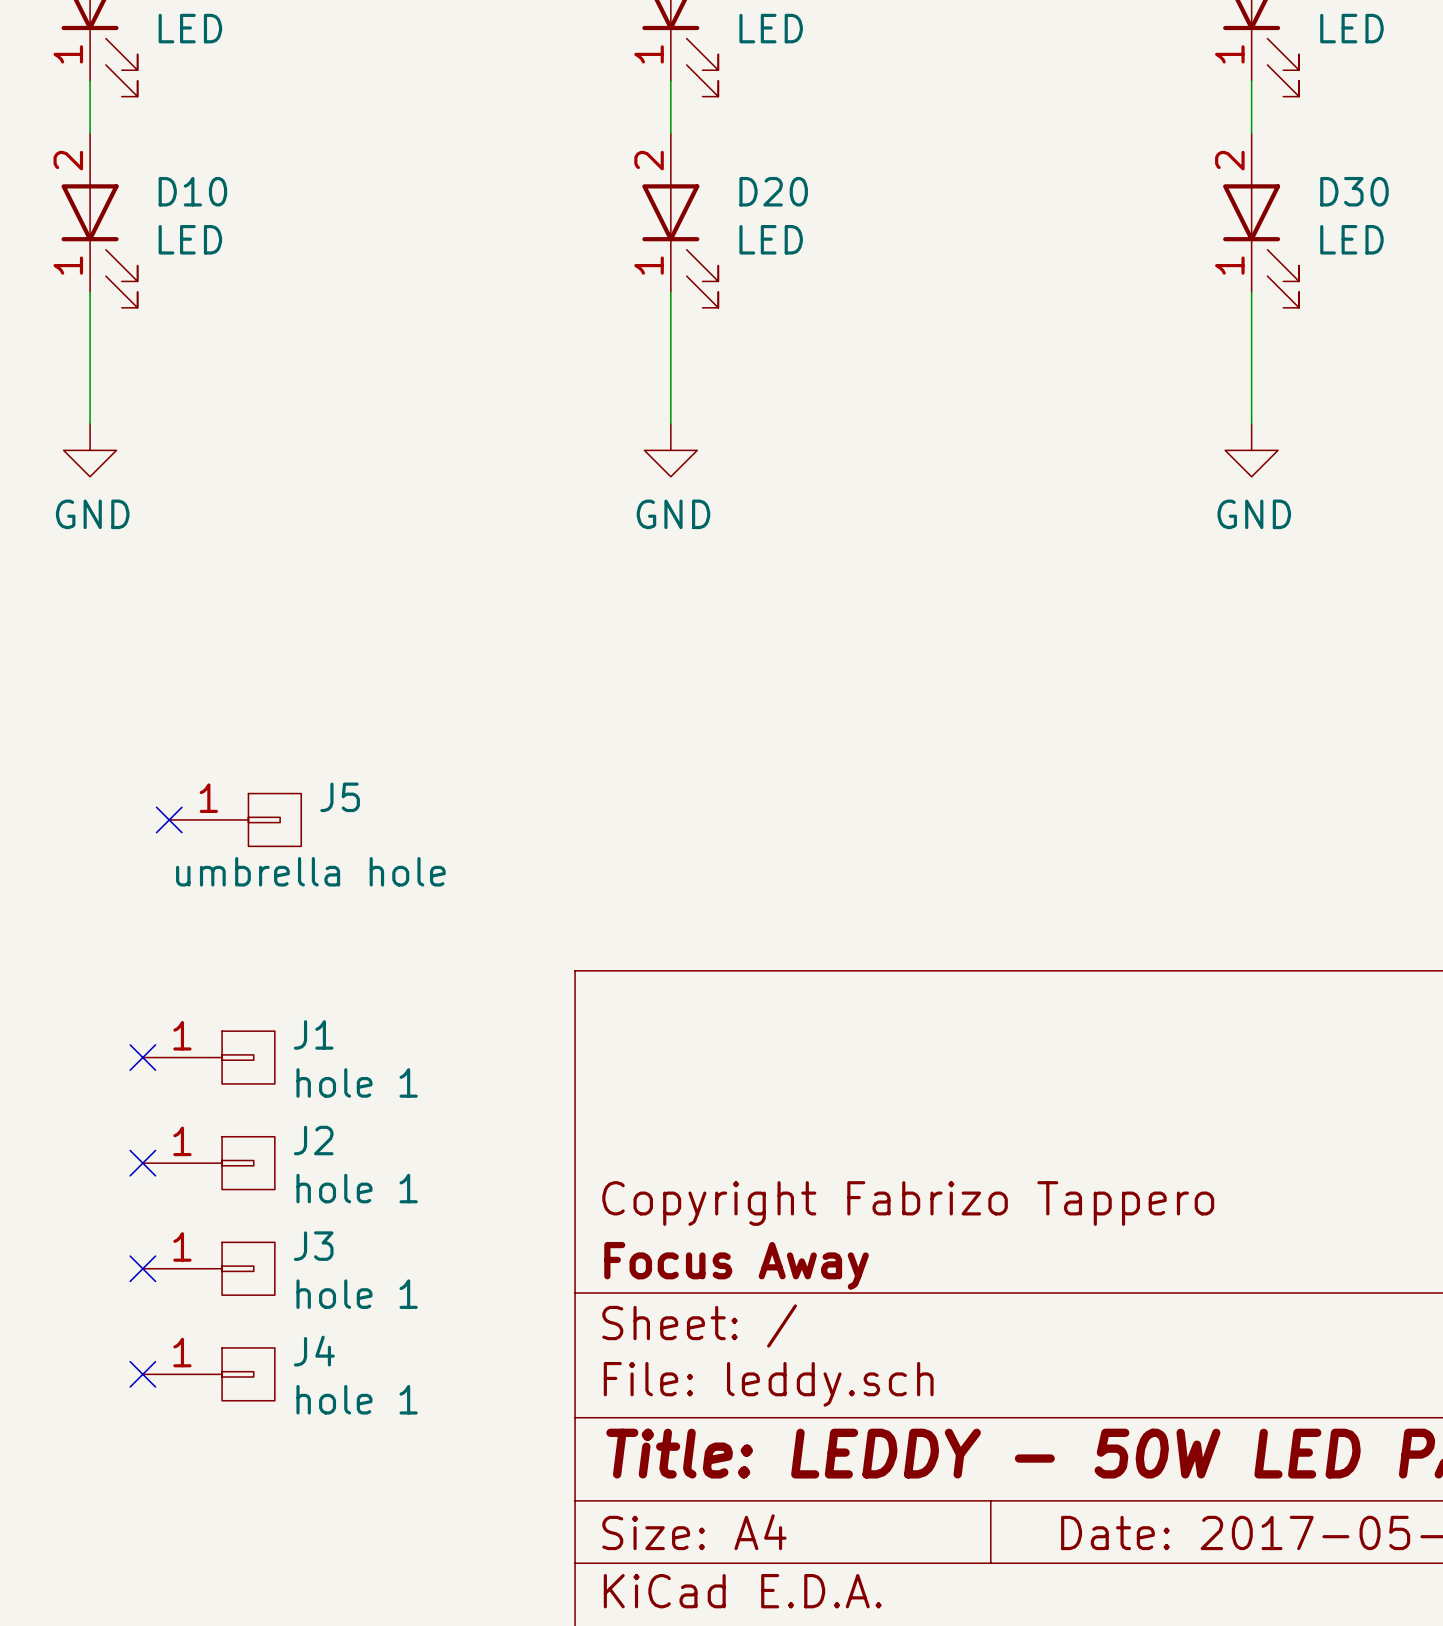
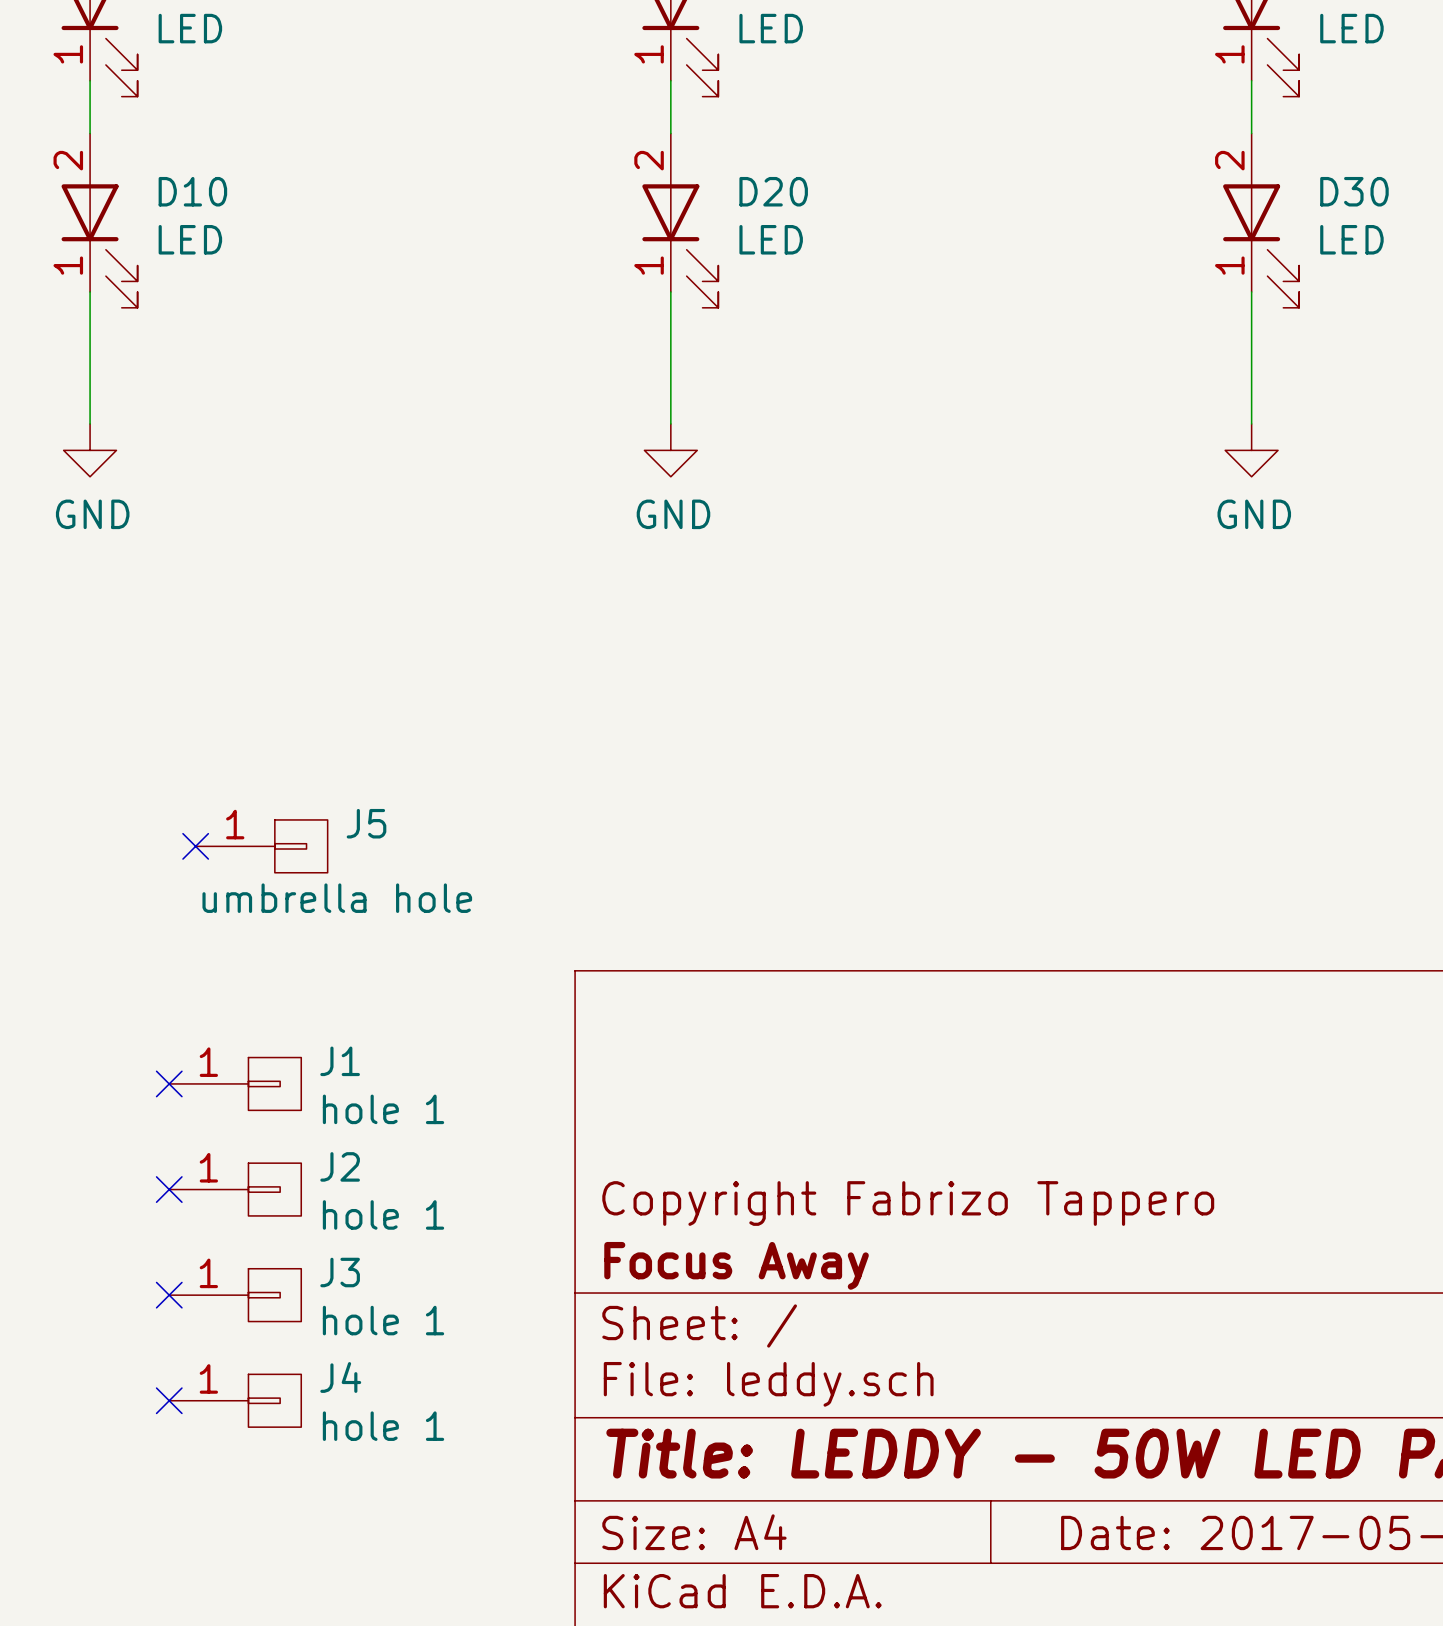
no-connect mark position: (169, 819) -> (195, 846)
J5 position: (235, 819) -> (261, 846)
no-connect mark position: (142, 1057) -> (169, 1083)
J1 position: (208, 1057) -> (235, 1083)
no-connect mark position: (142, 1163) -> (169, 1189)
J2 position: (208, 1163) -> (235, 1189)
no-connect mark position: (142, 1268) -> (169, 1295)
J3 position: (208, 1268) -> (235, 1295)
no-connect mark position: (142, 1374) -> (169, 1400)
J4 position: (208, 1374) -> (235, 1400)

